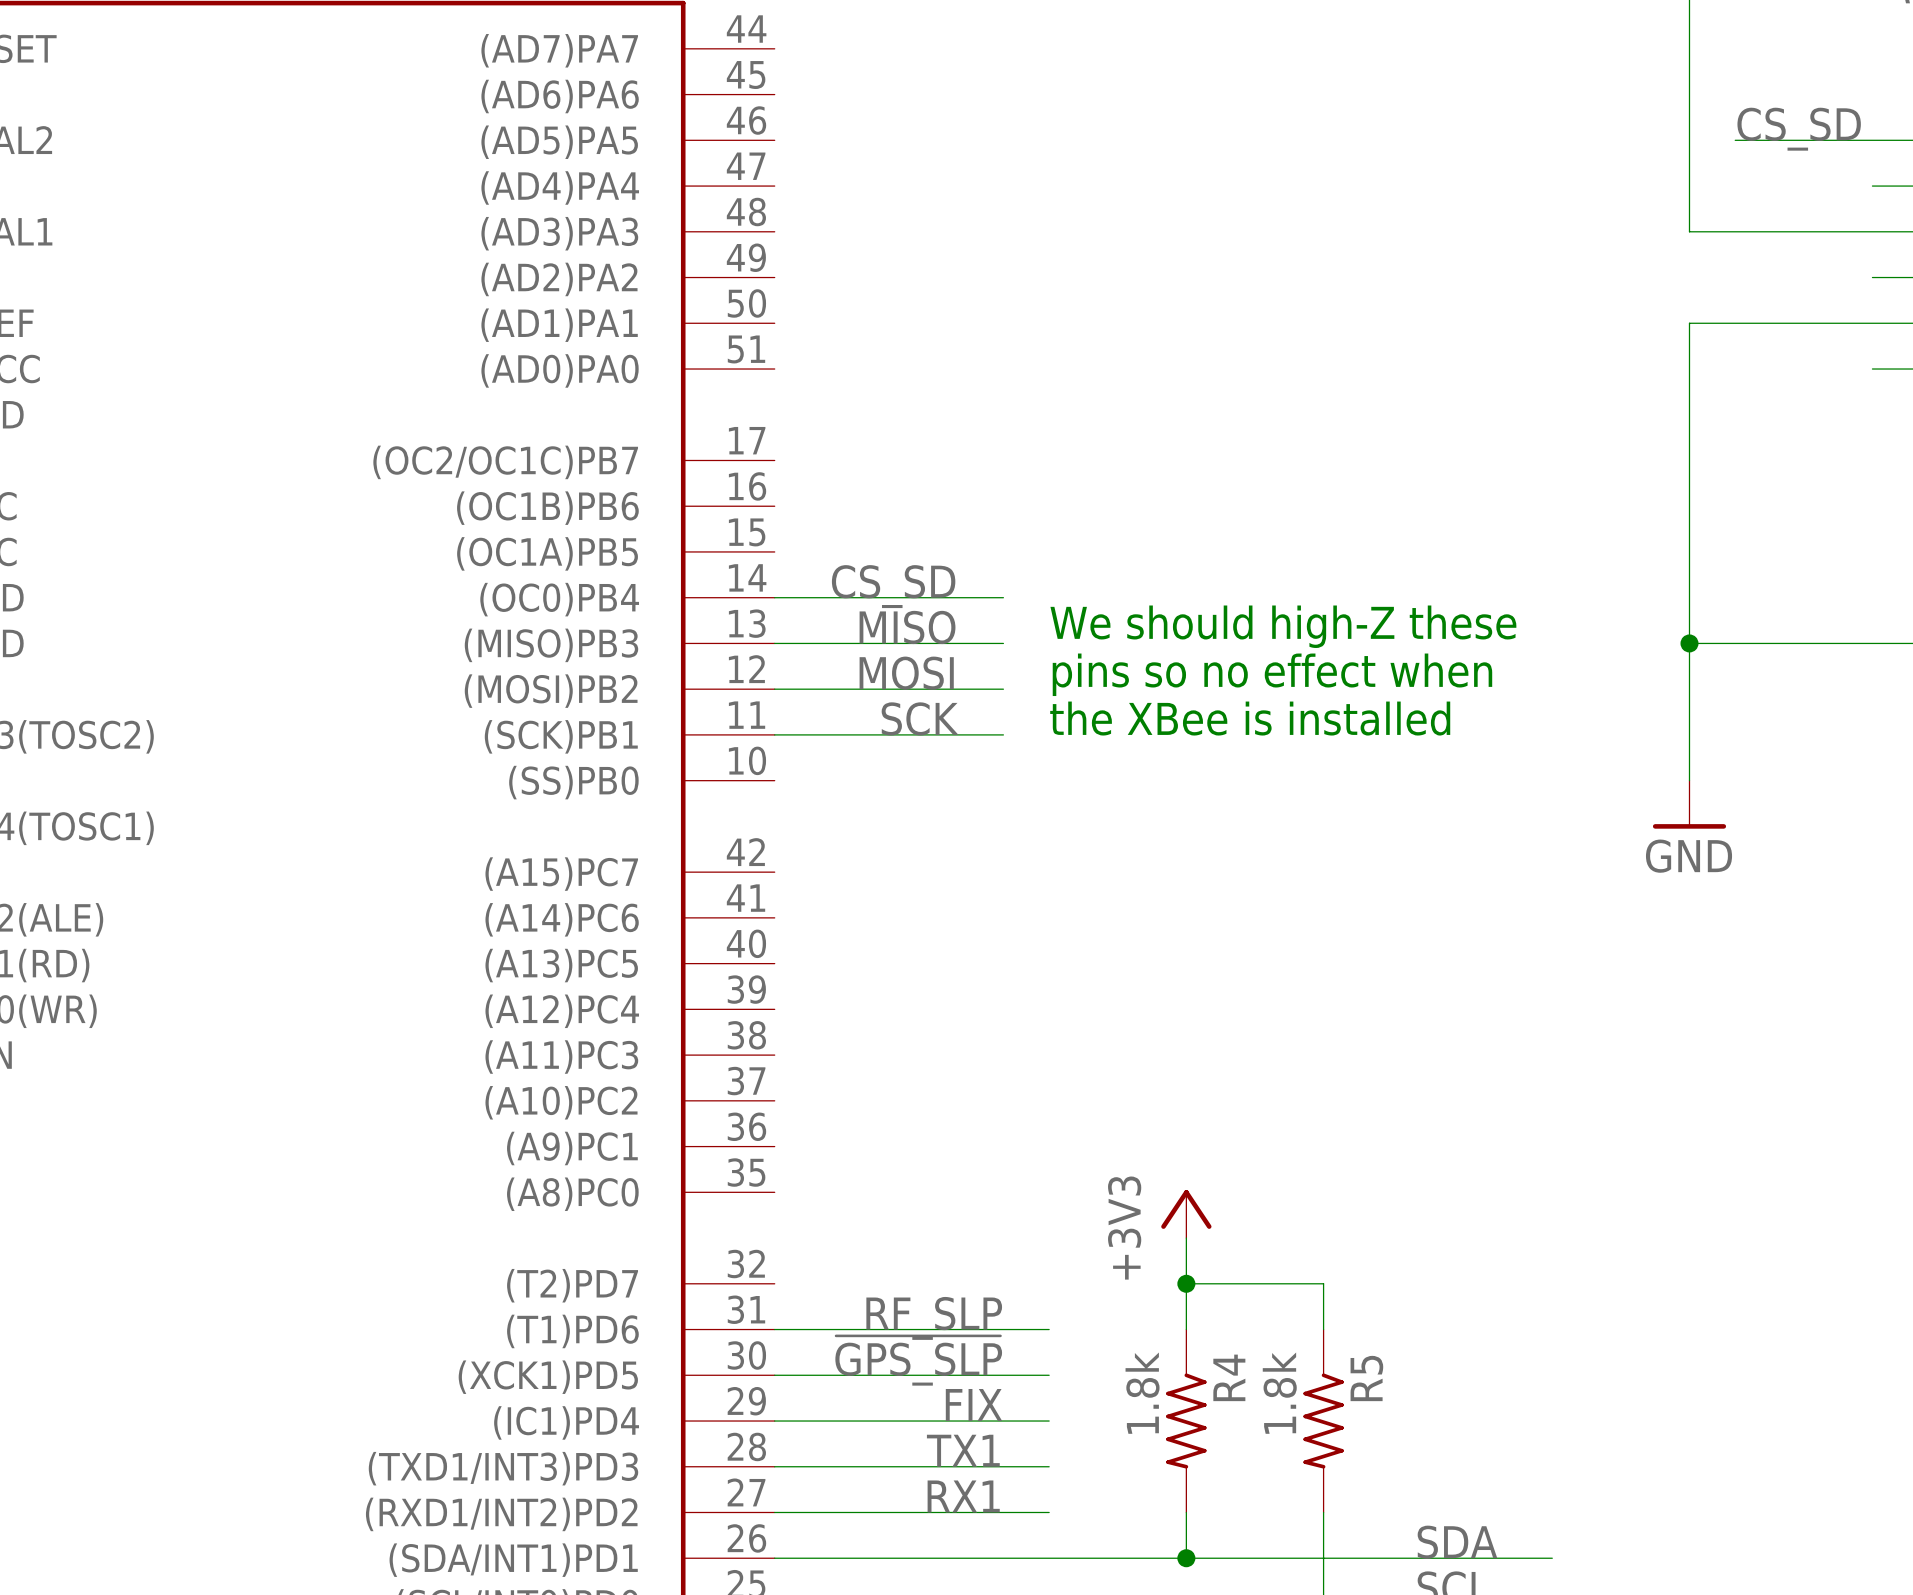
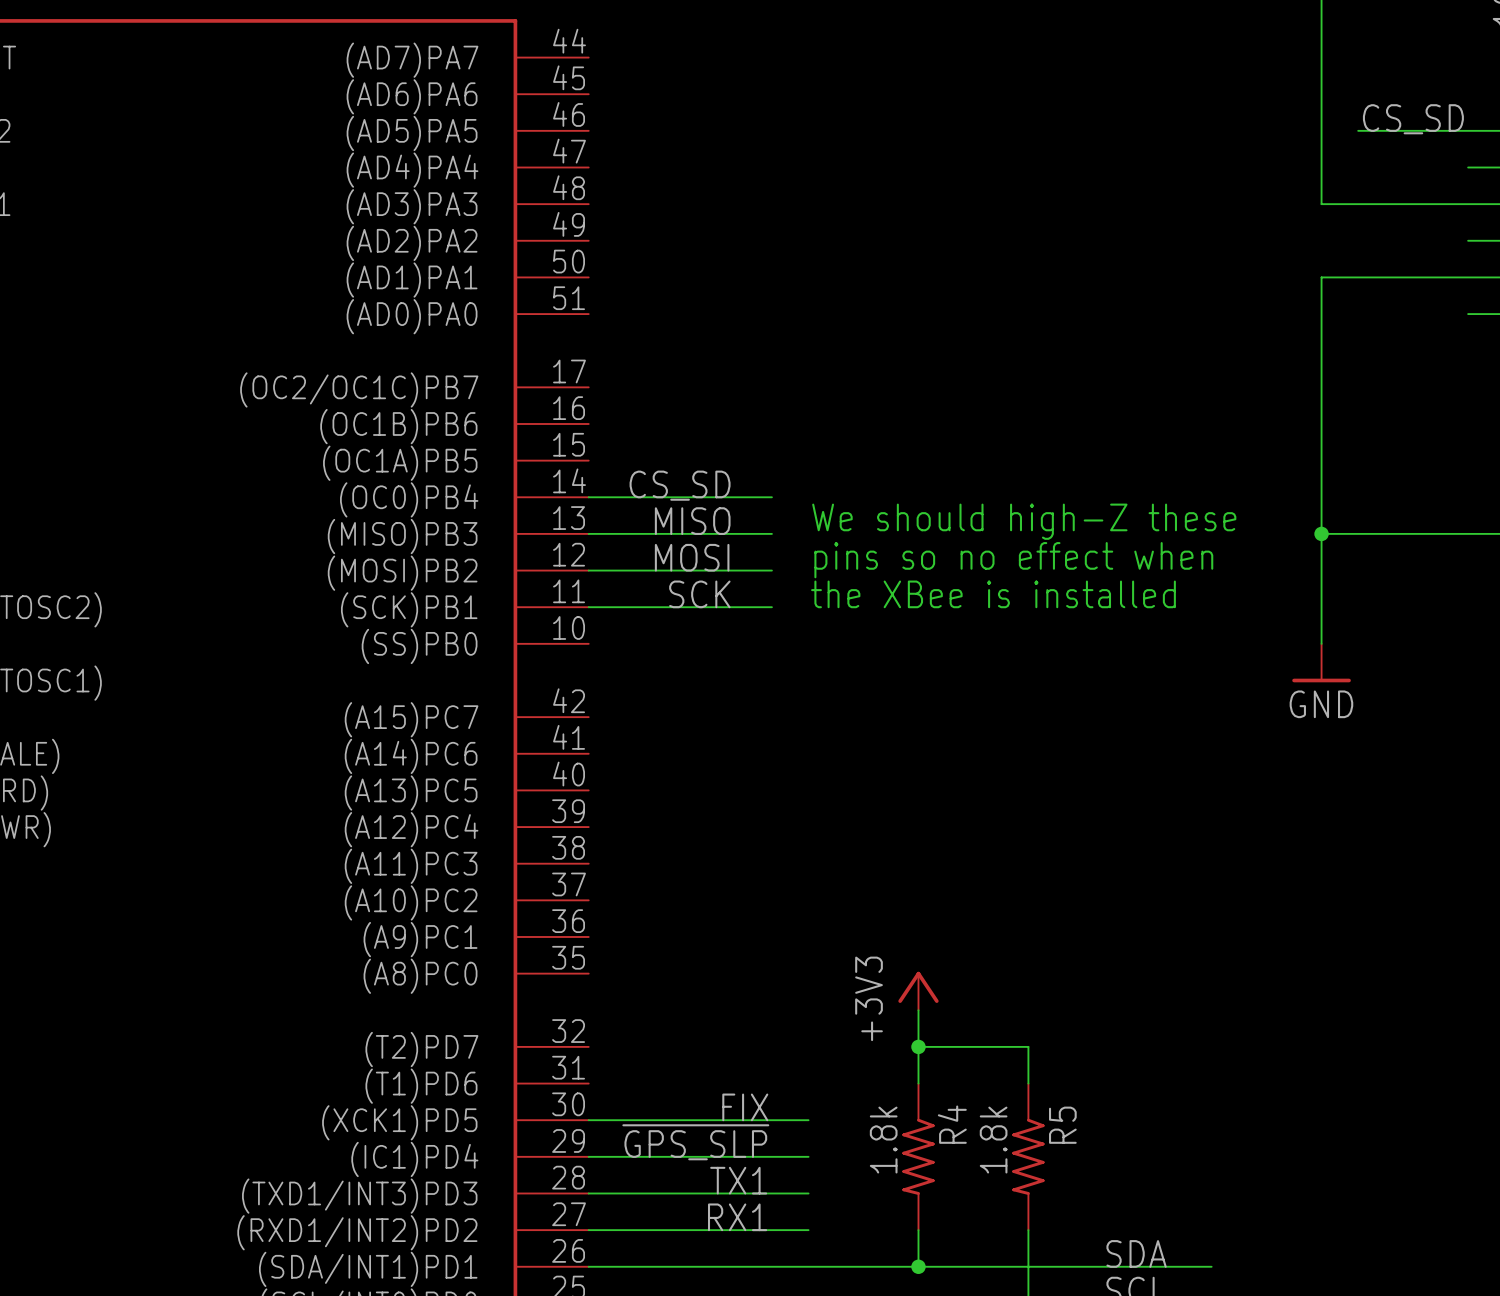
label: RF_SLP (934, 1318) -> none
wire: (774, 1329) (1049, 1329) -> none
label: ~{GPS_SLP} (918, 1360) -> FIX (745, 1107)
label: FIX (973, 1405) -> ~{GPS_SLP} (695, 1142)

